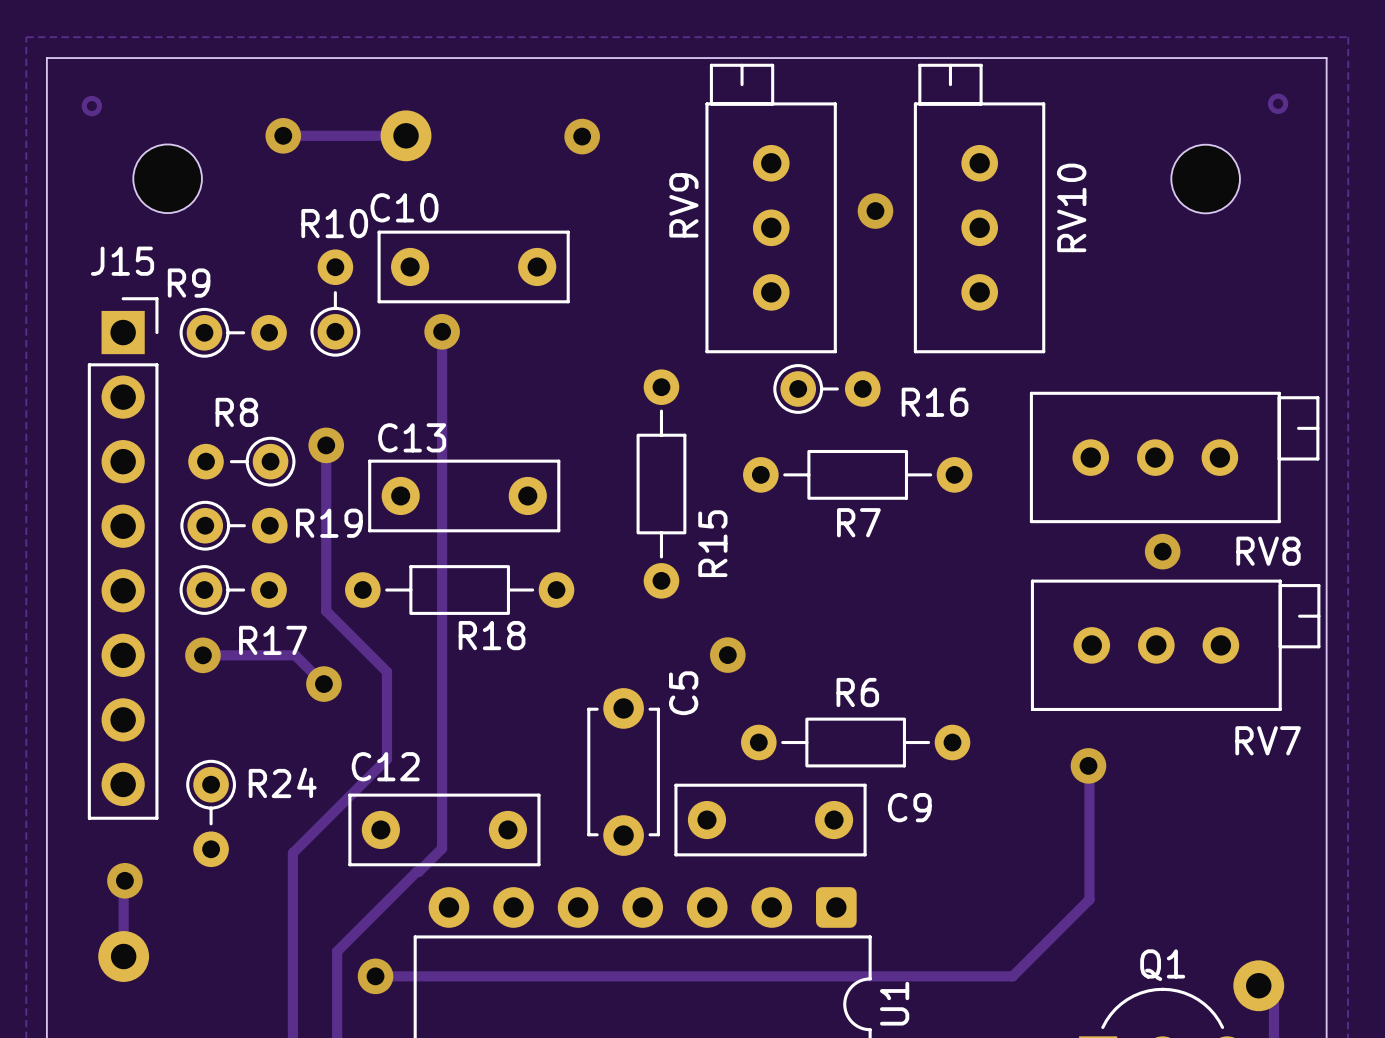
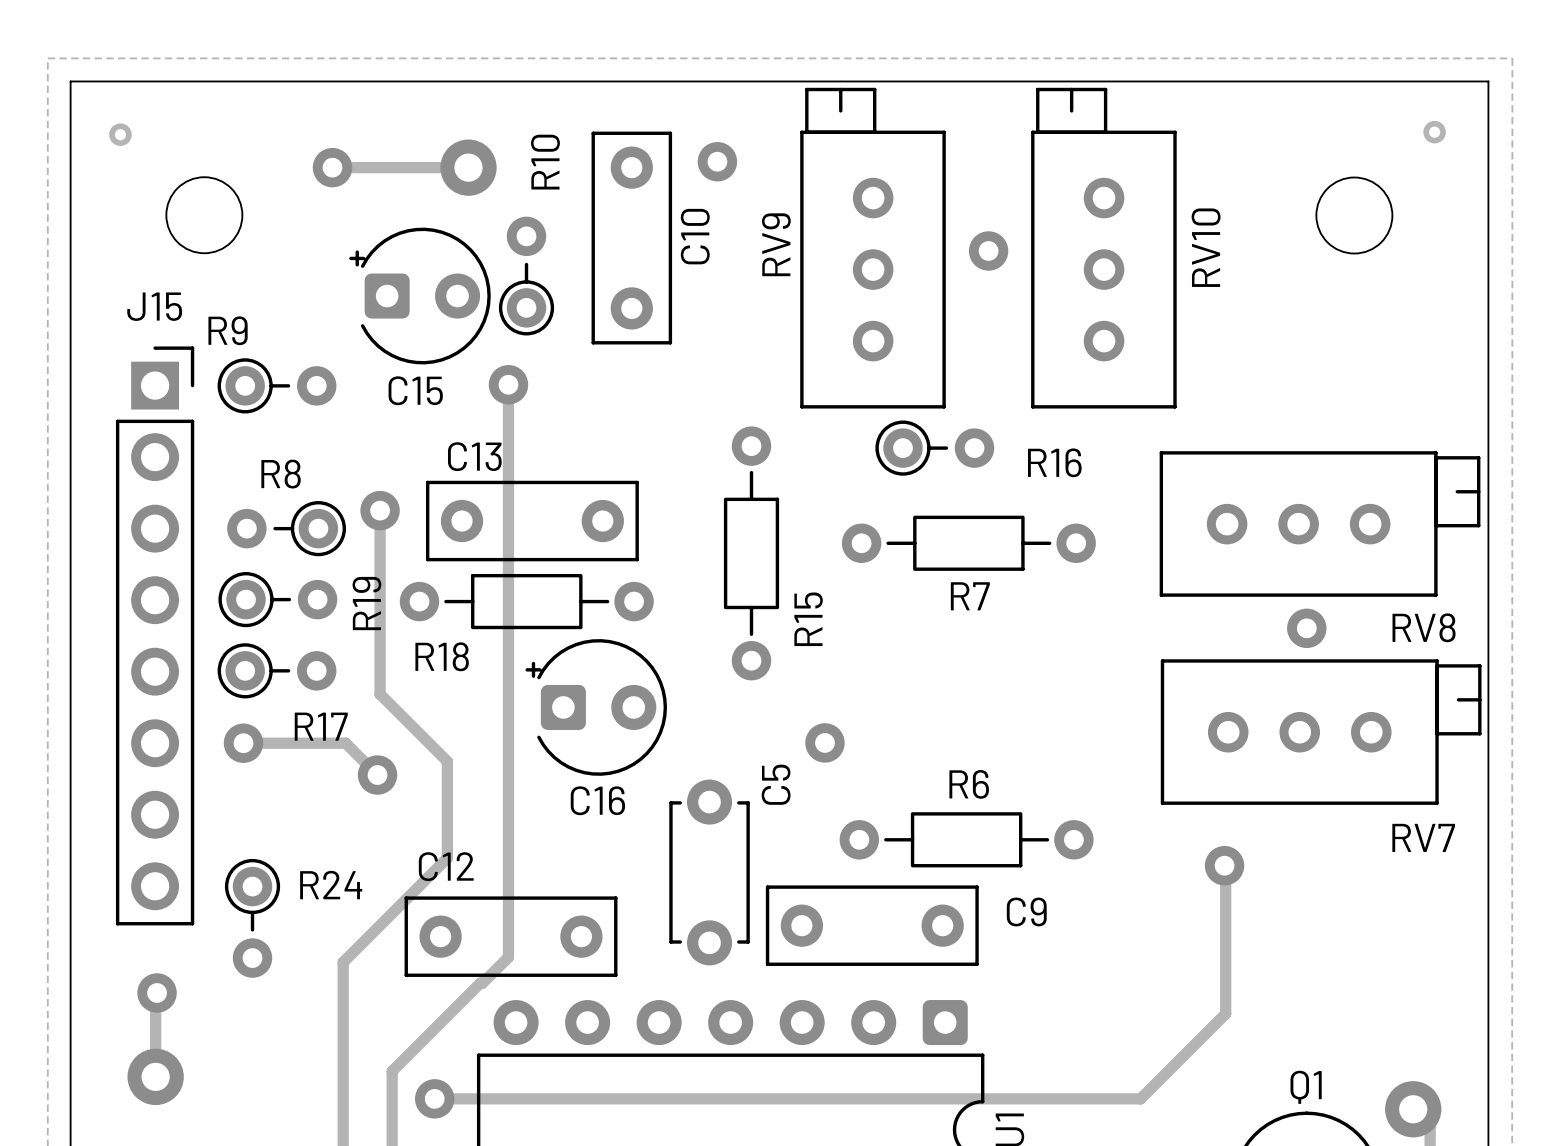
via position: (582, 136) -> (717, 161)
C10 name position: C10 (404, 207) -> C10 (695, 236)
R10 name rotation: 0° (334, 223) -> 90° counterclockwise (545, 162)
C15: none -> (419, 296)
C10 rotation: 0° (473, 266) -> 90° clockwise (631, 238)
R10 position: (335, 303) -> (526, 276)
C13 position: (464, 495) -> (532, 521)
R19 name rotation: 0° (329, 523) -> 90° counterclockwise (366, 603)
R18 position: (459, 590) -> (526, 601)
C16: none -> (596, 707)
R18 name position: R18 (492, 635) -> R18 (442, 656)

